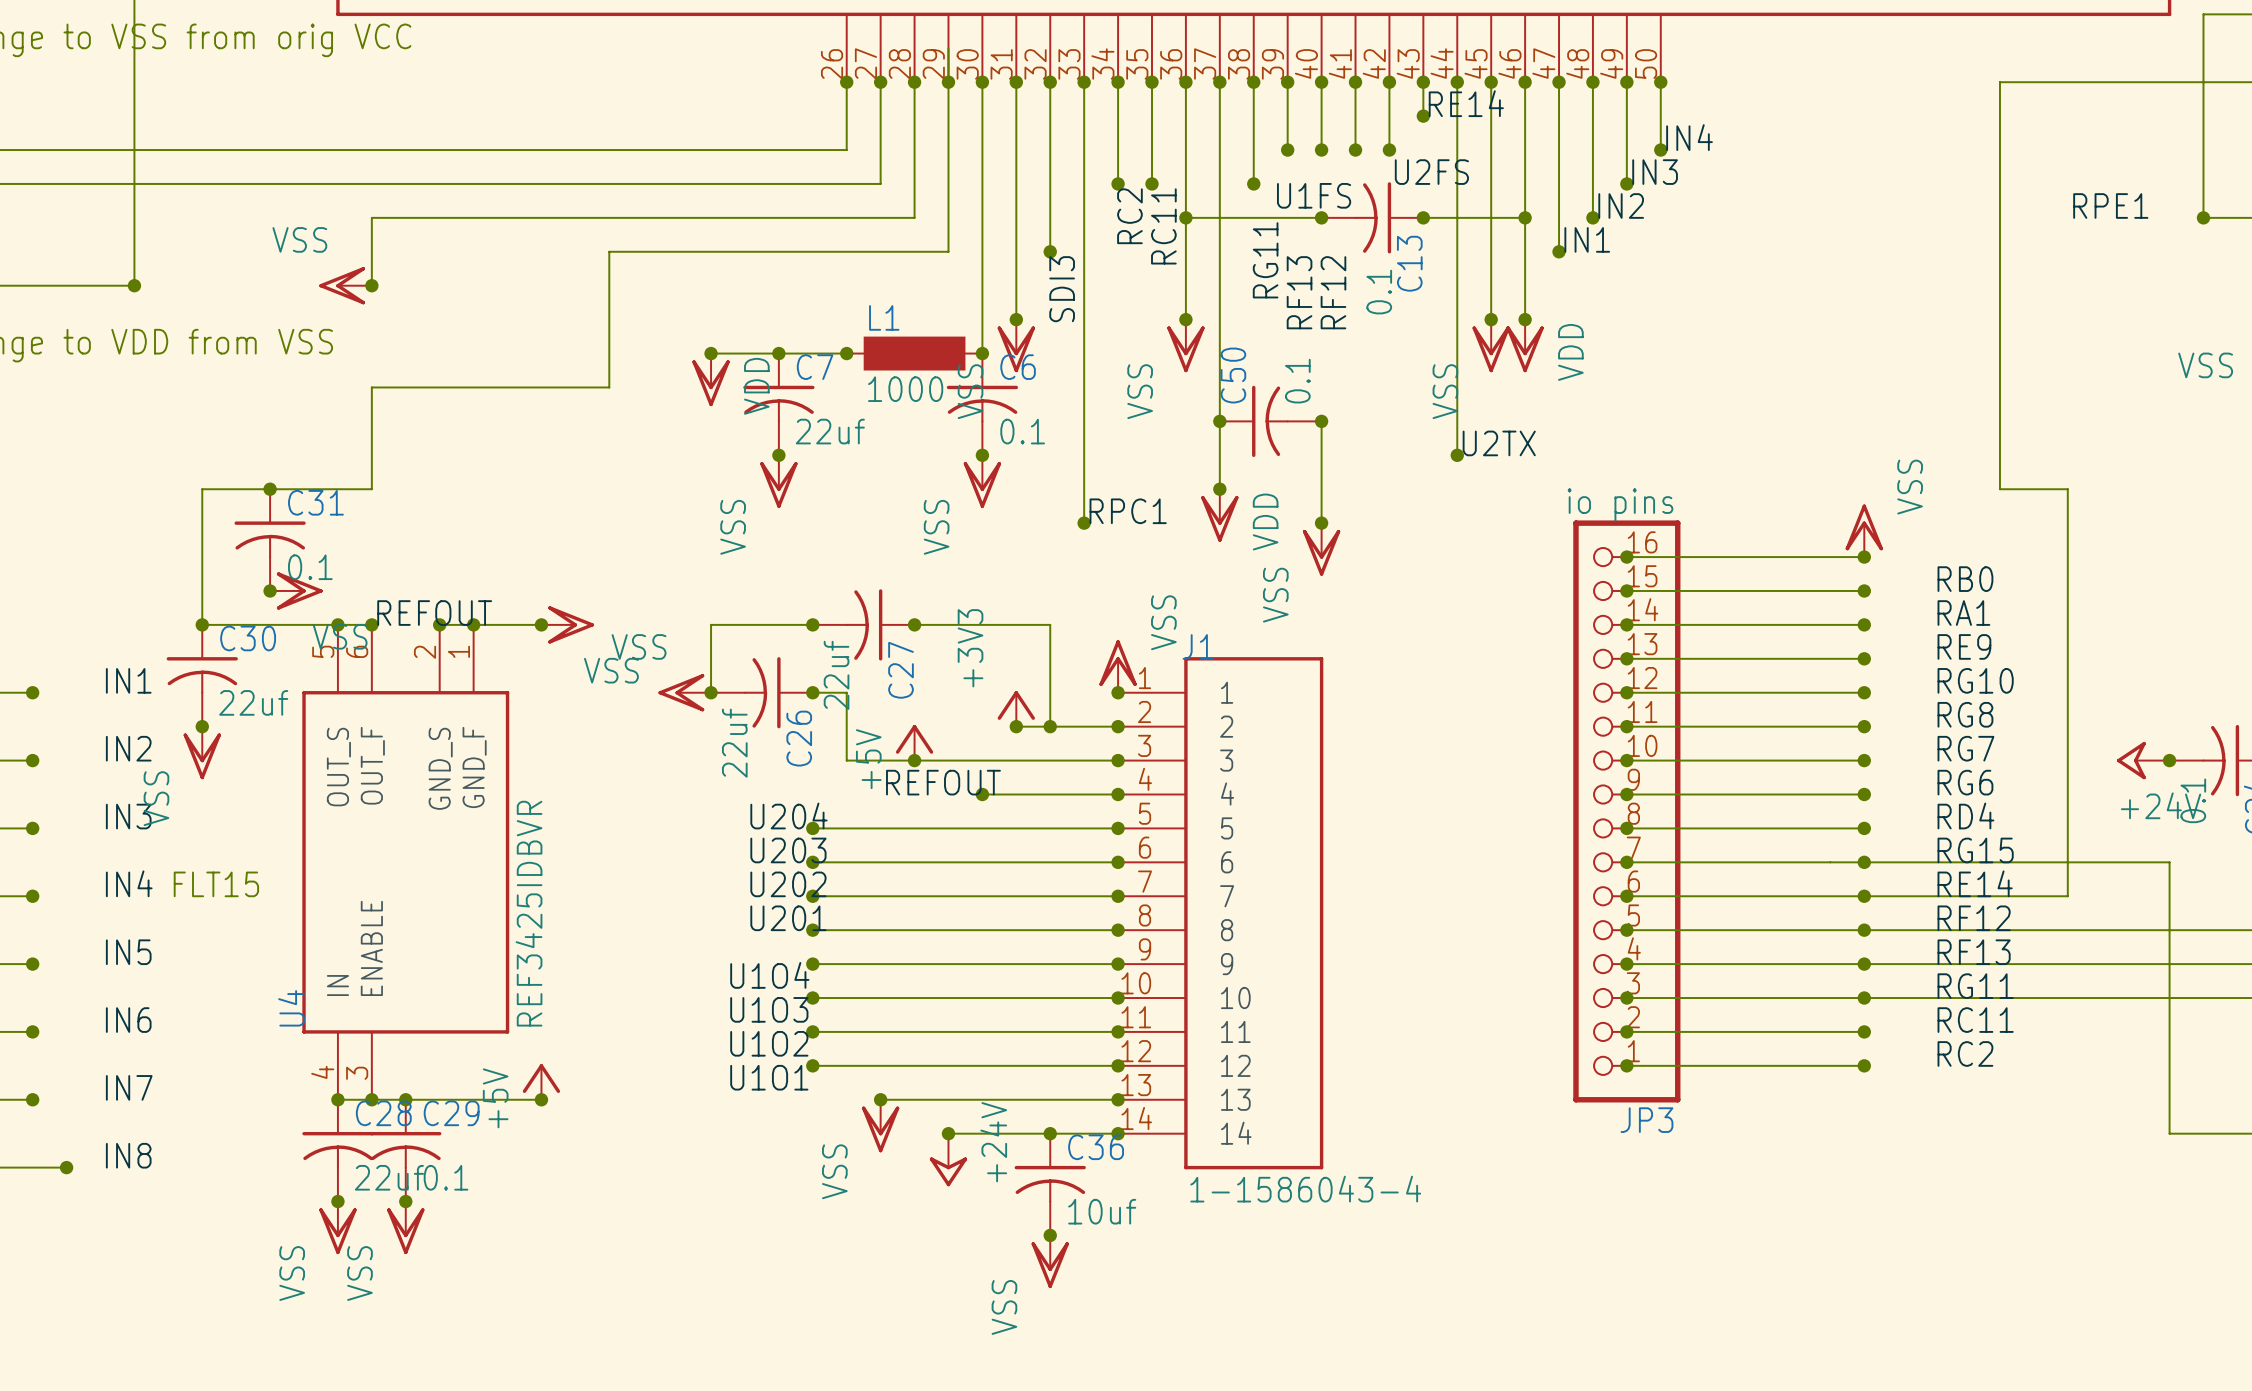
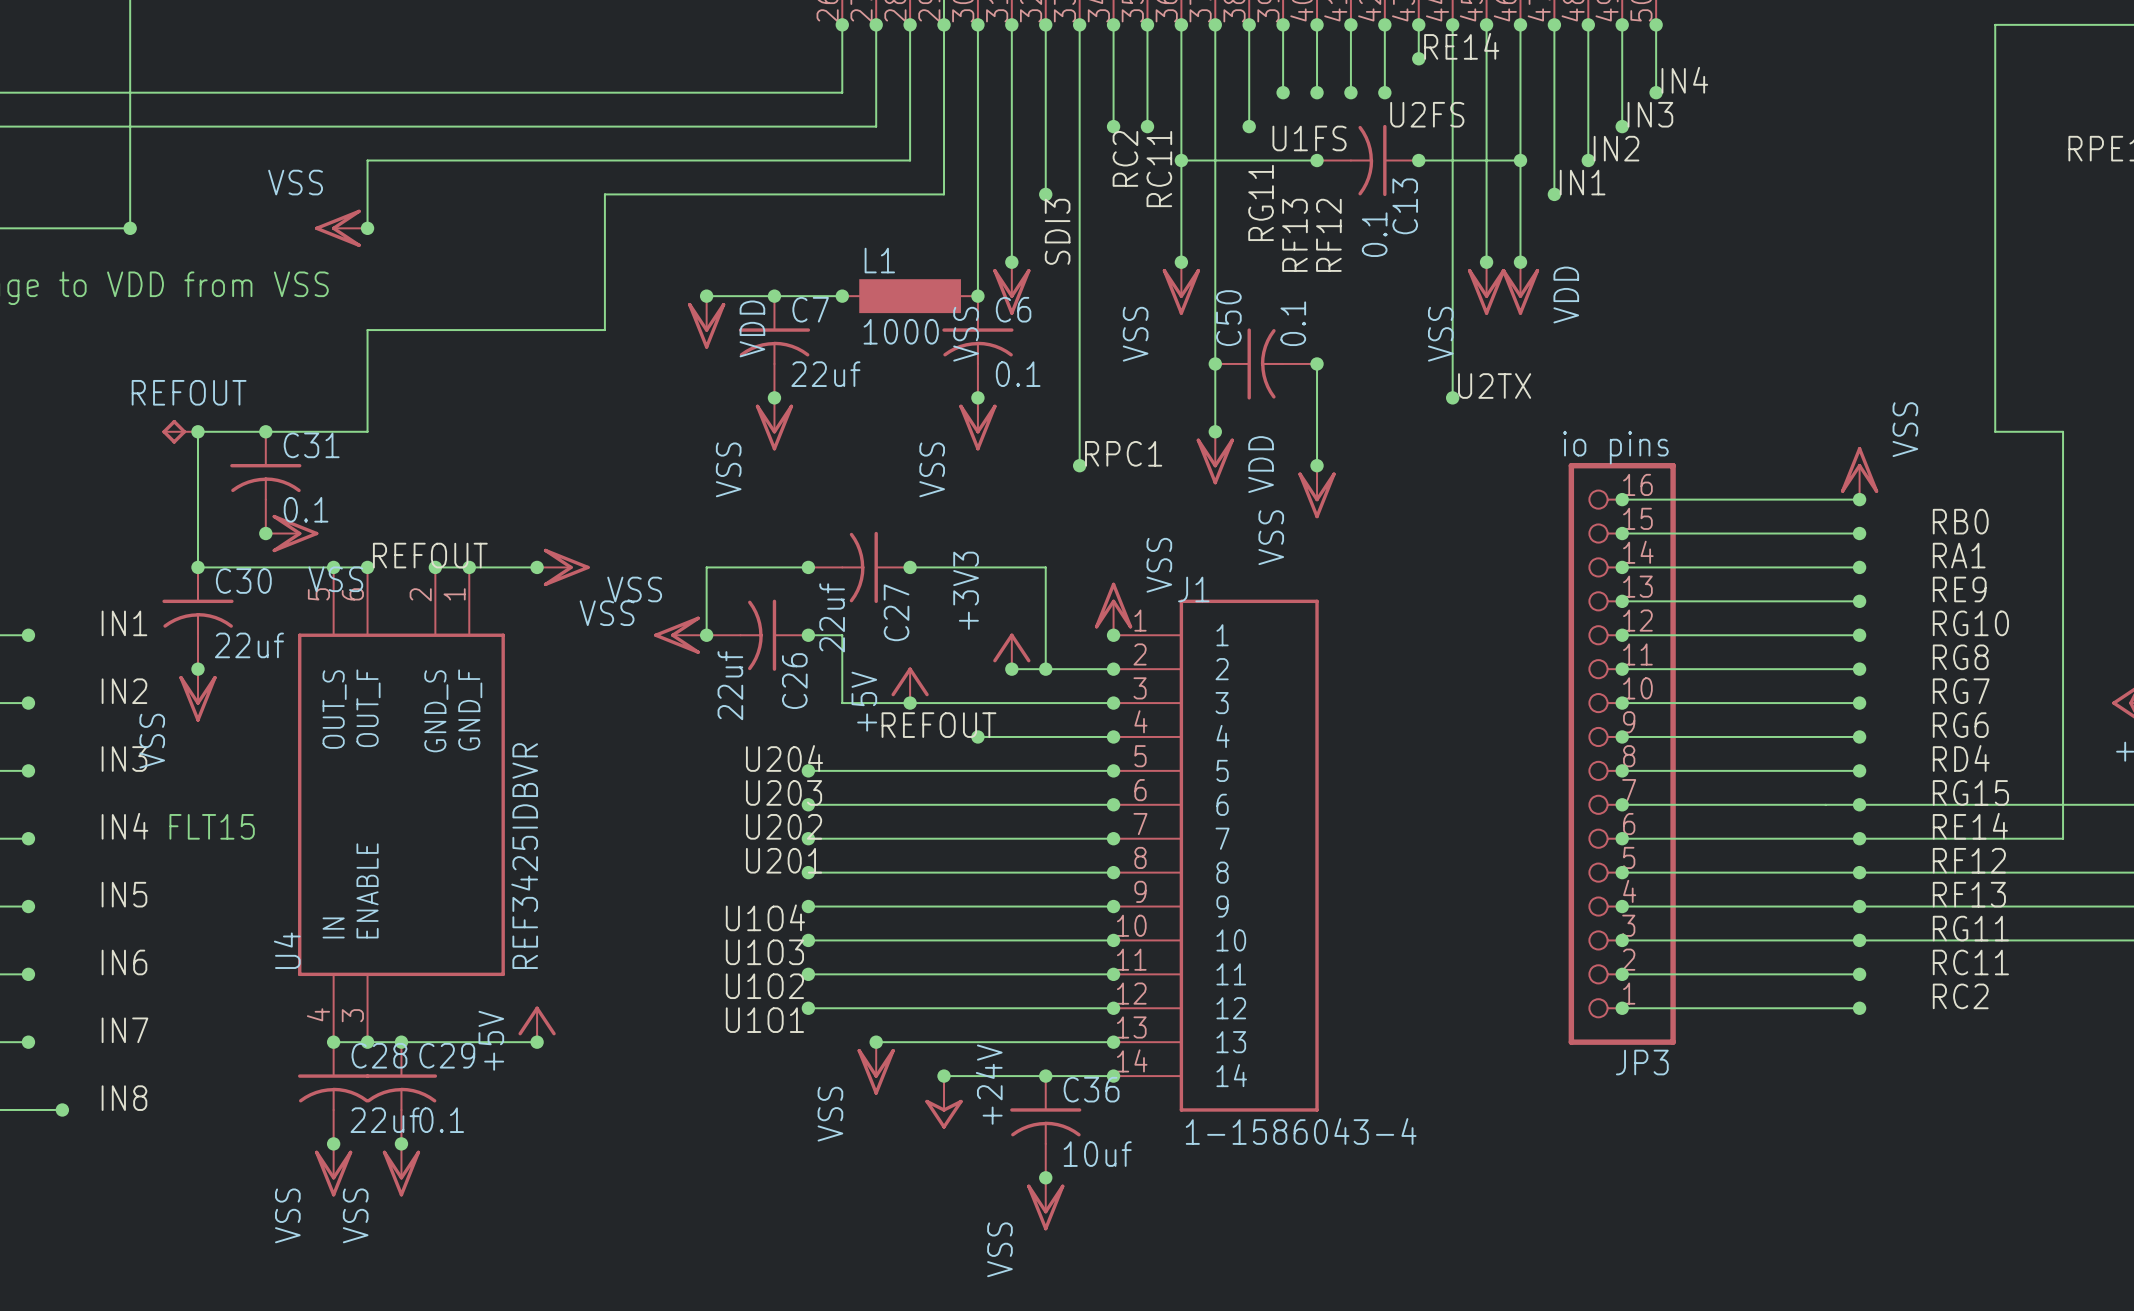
REFOUT: none -> (180, 431)
junction: none -> (197, 431)

